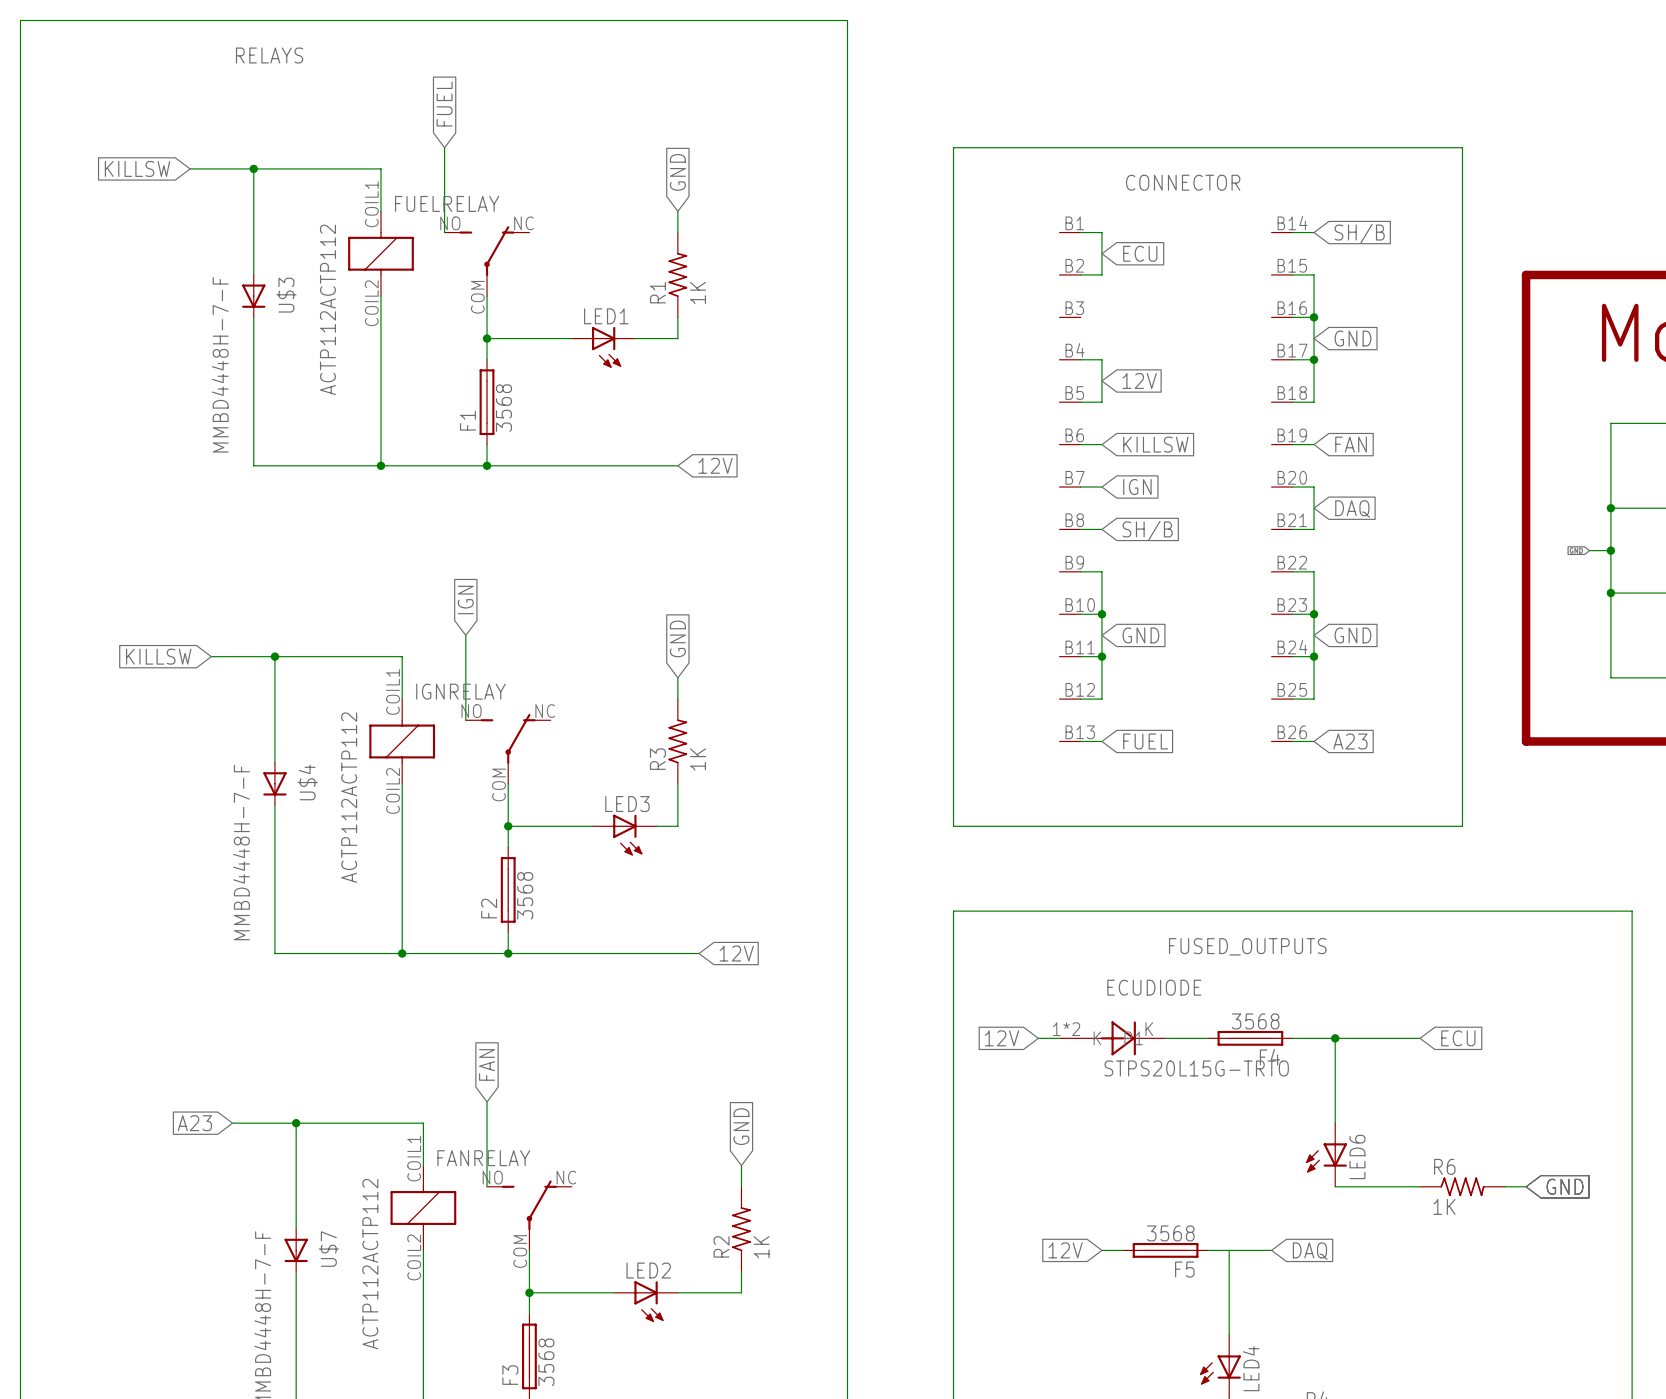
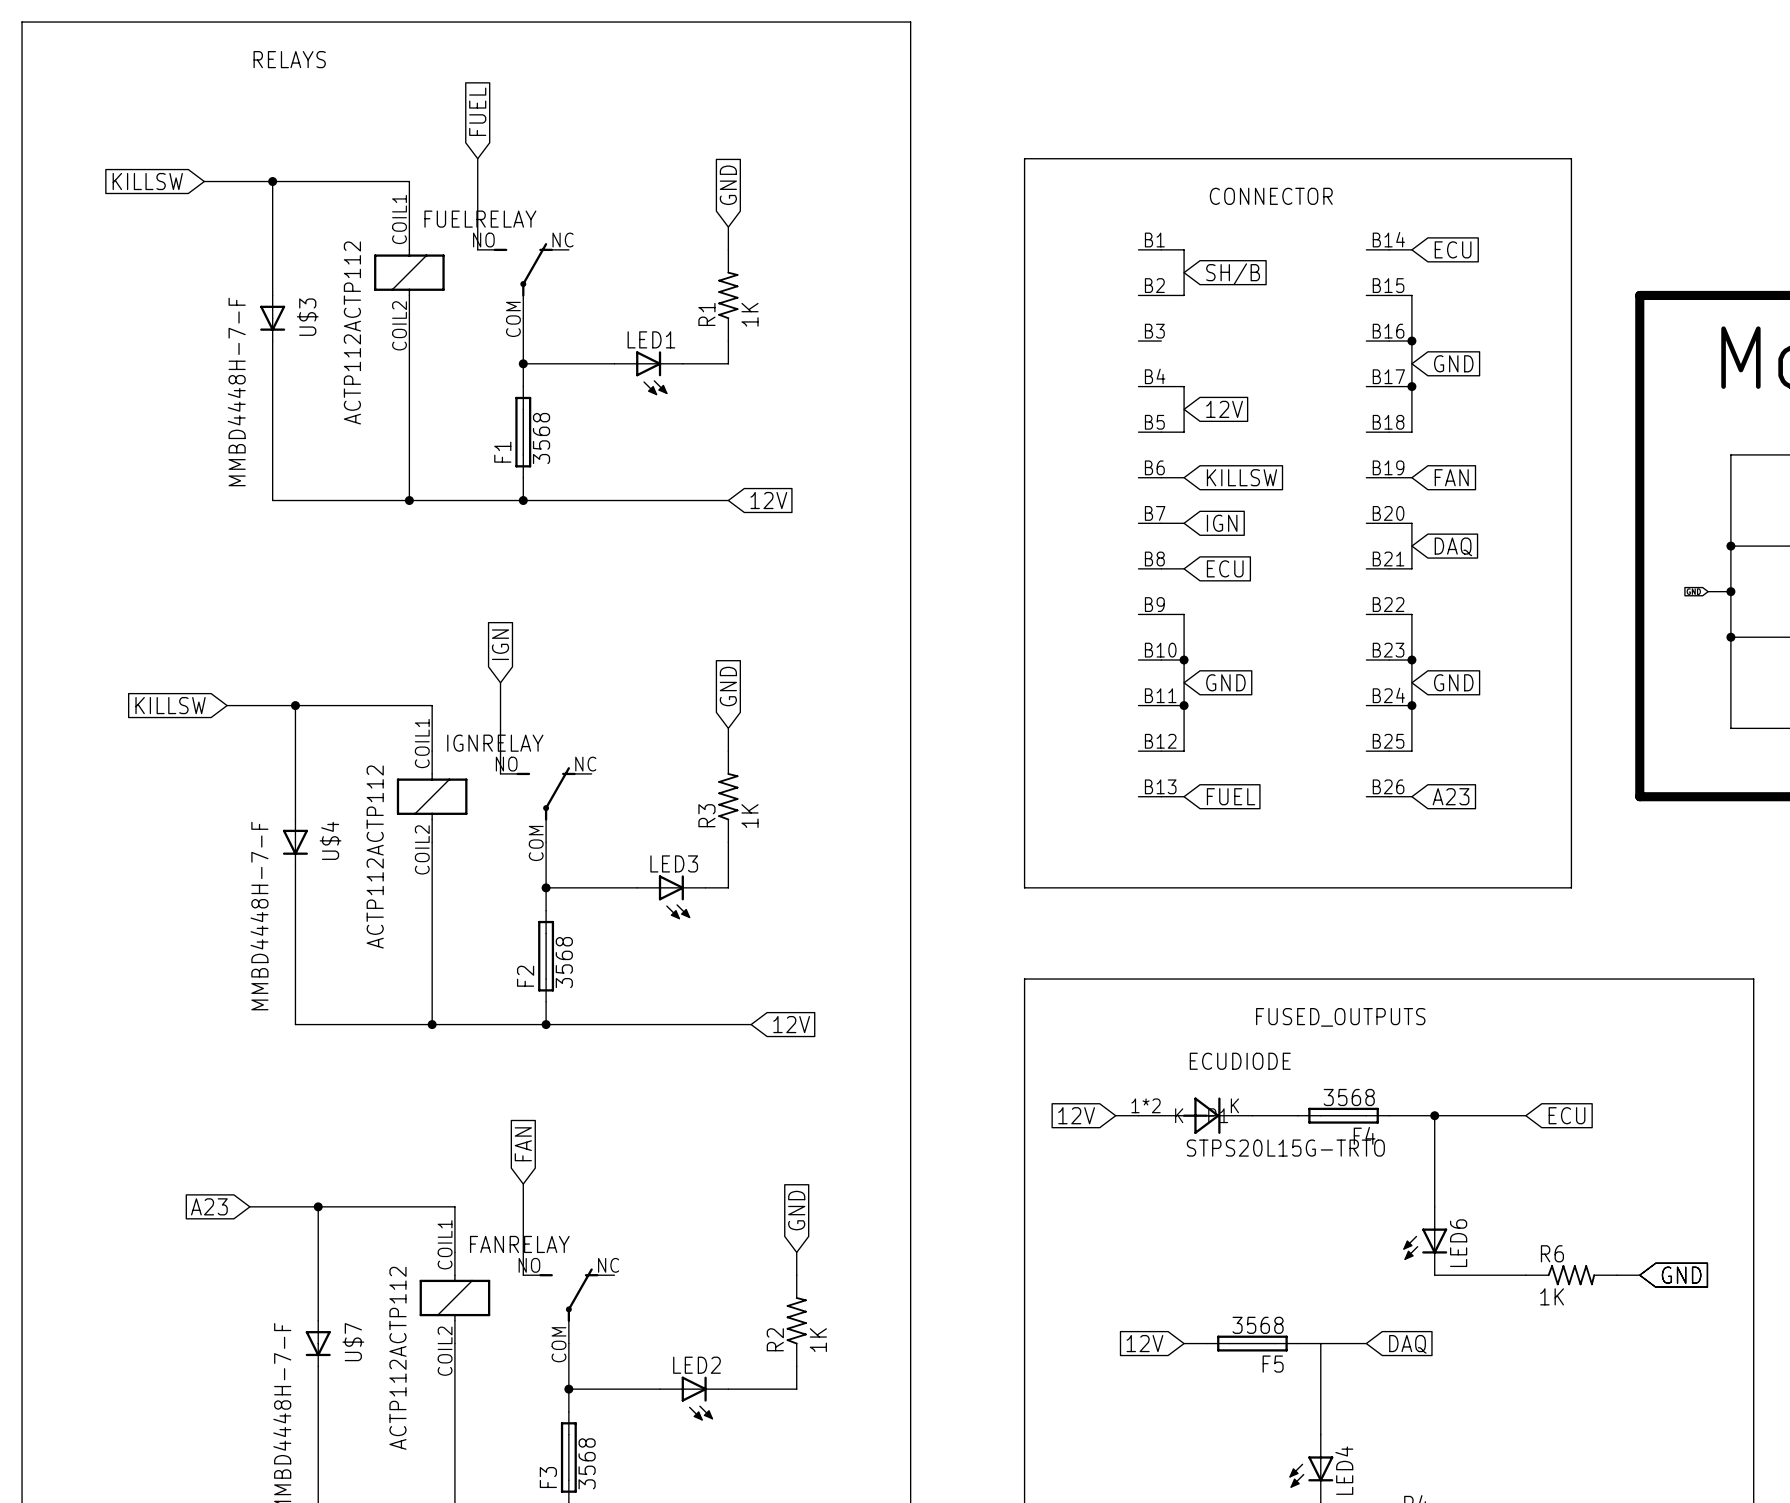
global label: SH/B (1359, 233) -> ECU (1453, 249)
global label: ECU (1140, 253) -> SH/B (1233, 274)
global label: SH/B (1147, 530) -> ECU (1225, 568)

